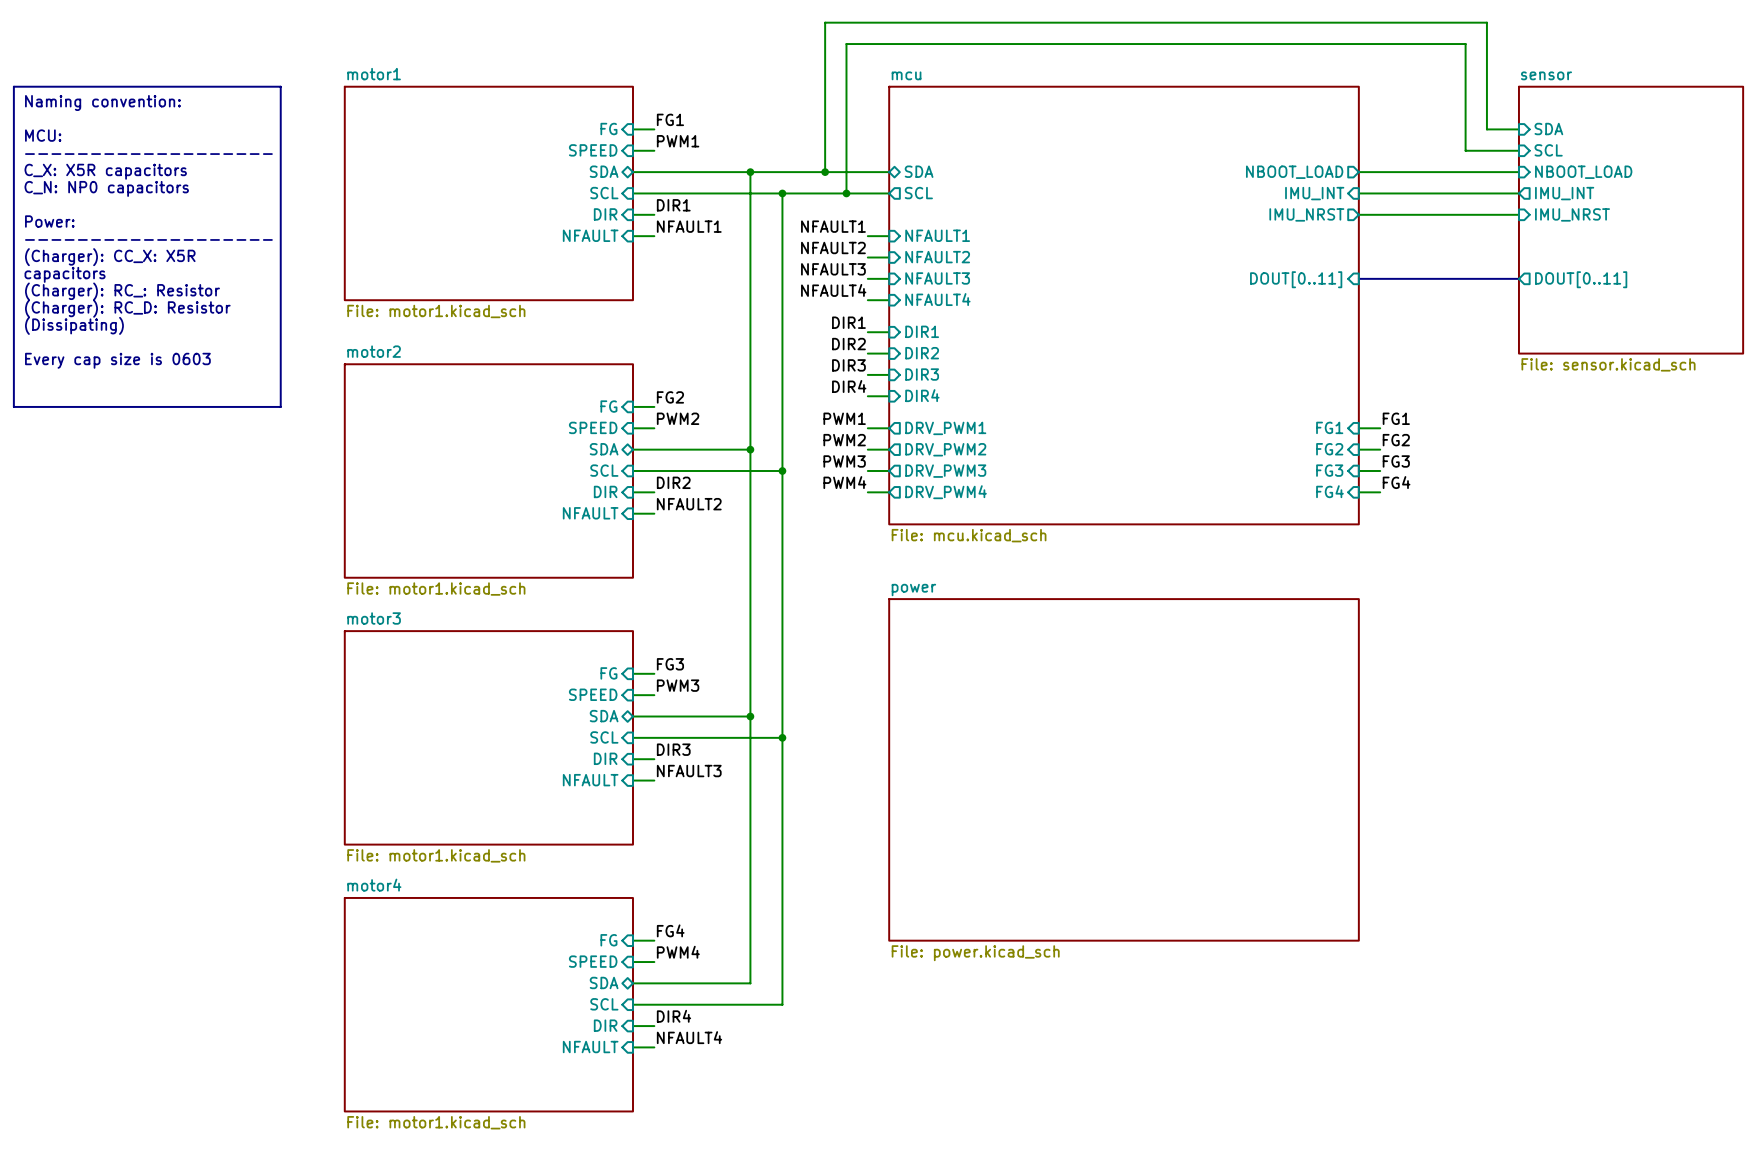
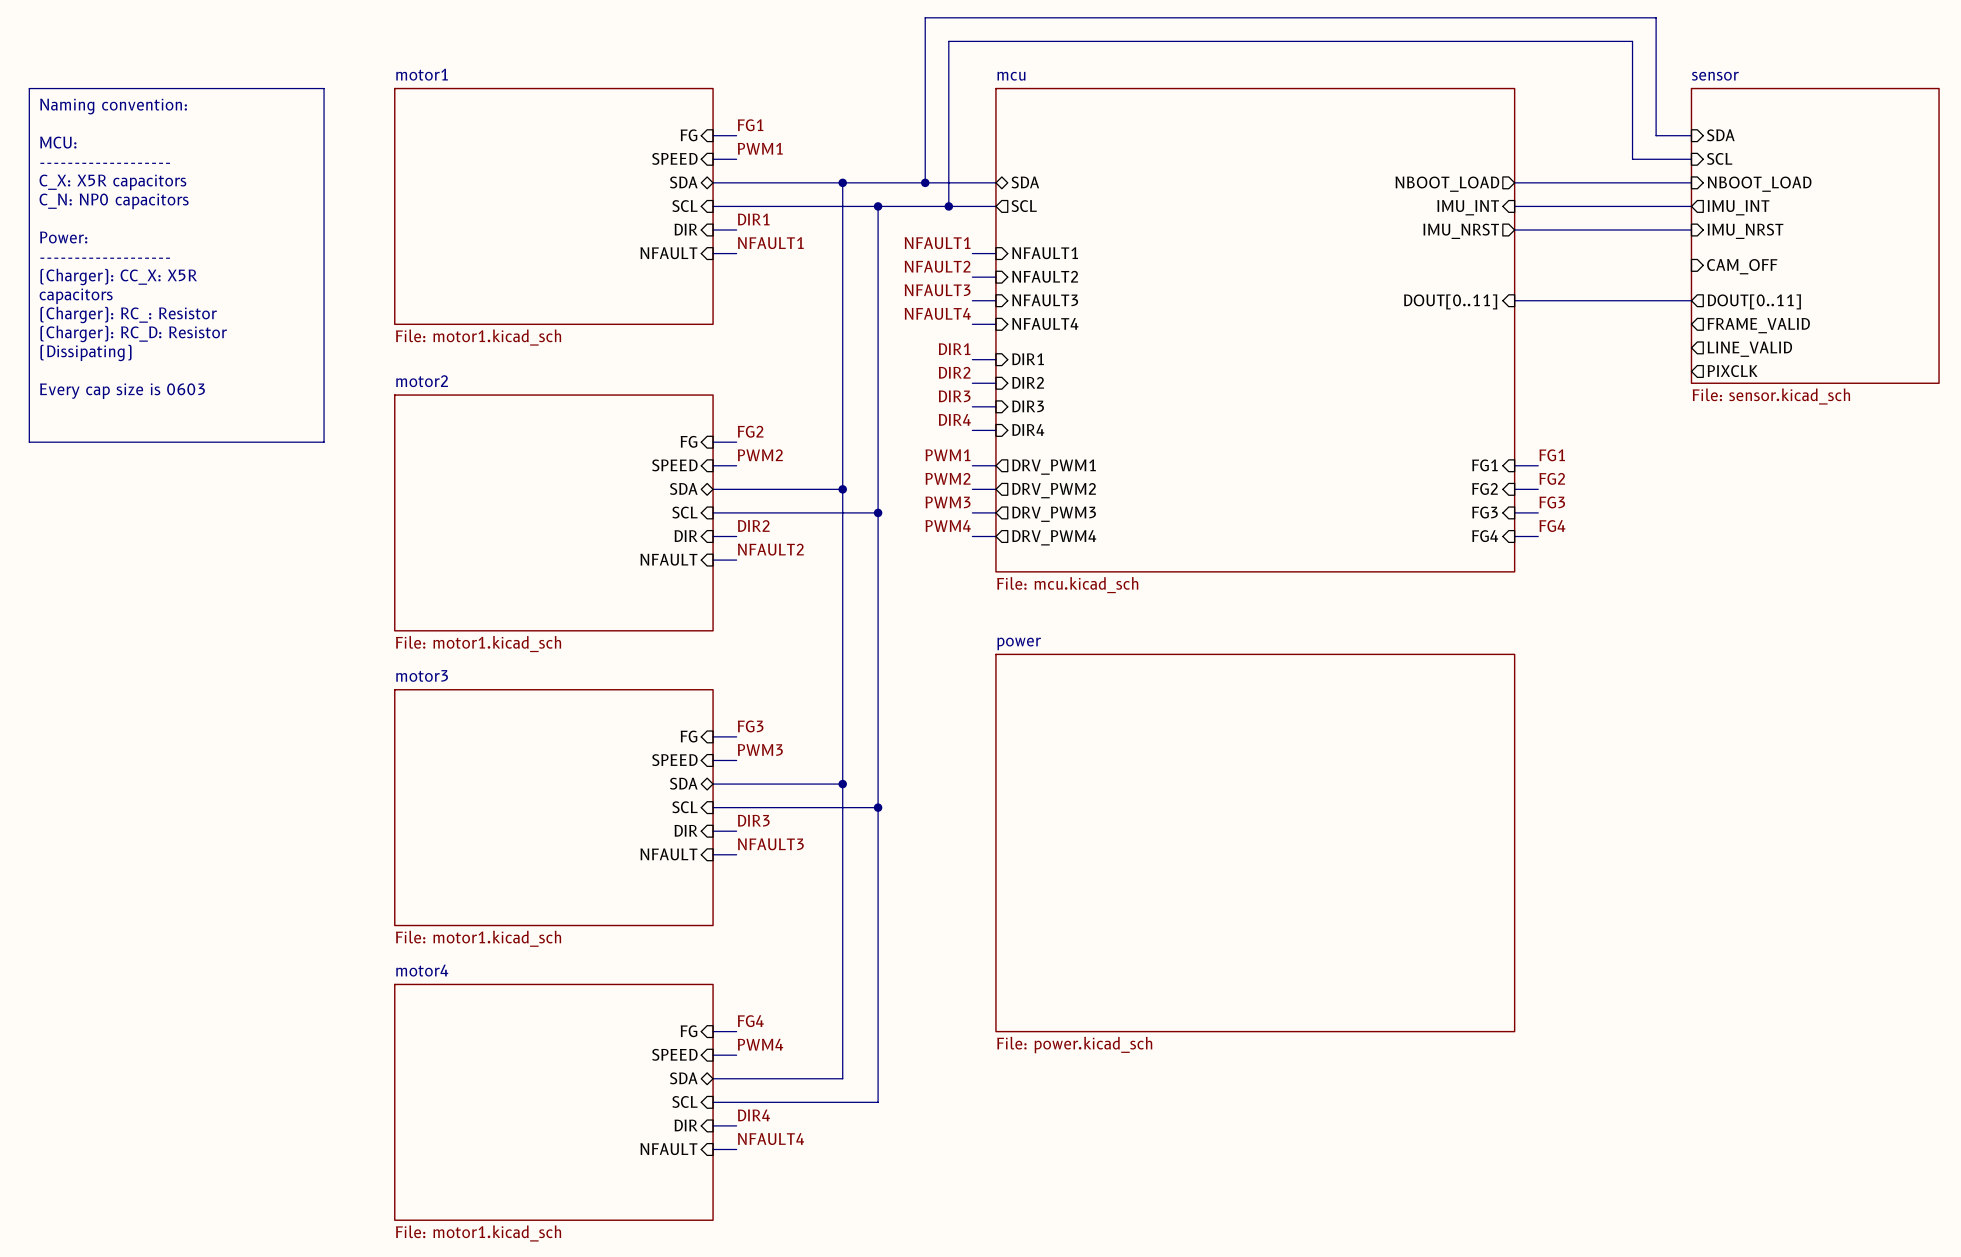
sheet pin: none -> CAM_OFF (1742, 266)
sheet pin: none -> FRAME_VALID (1758, 325)
sheet pin: none -> LINE_VALID (1749, 349)
sheet pin: none -> PIXCLK (1732, 371)

